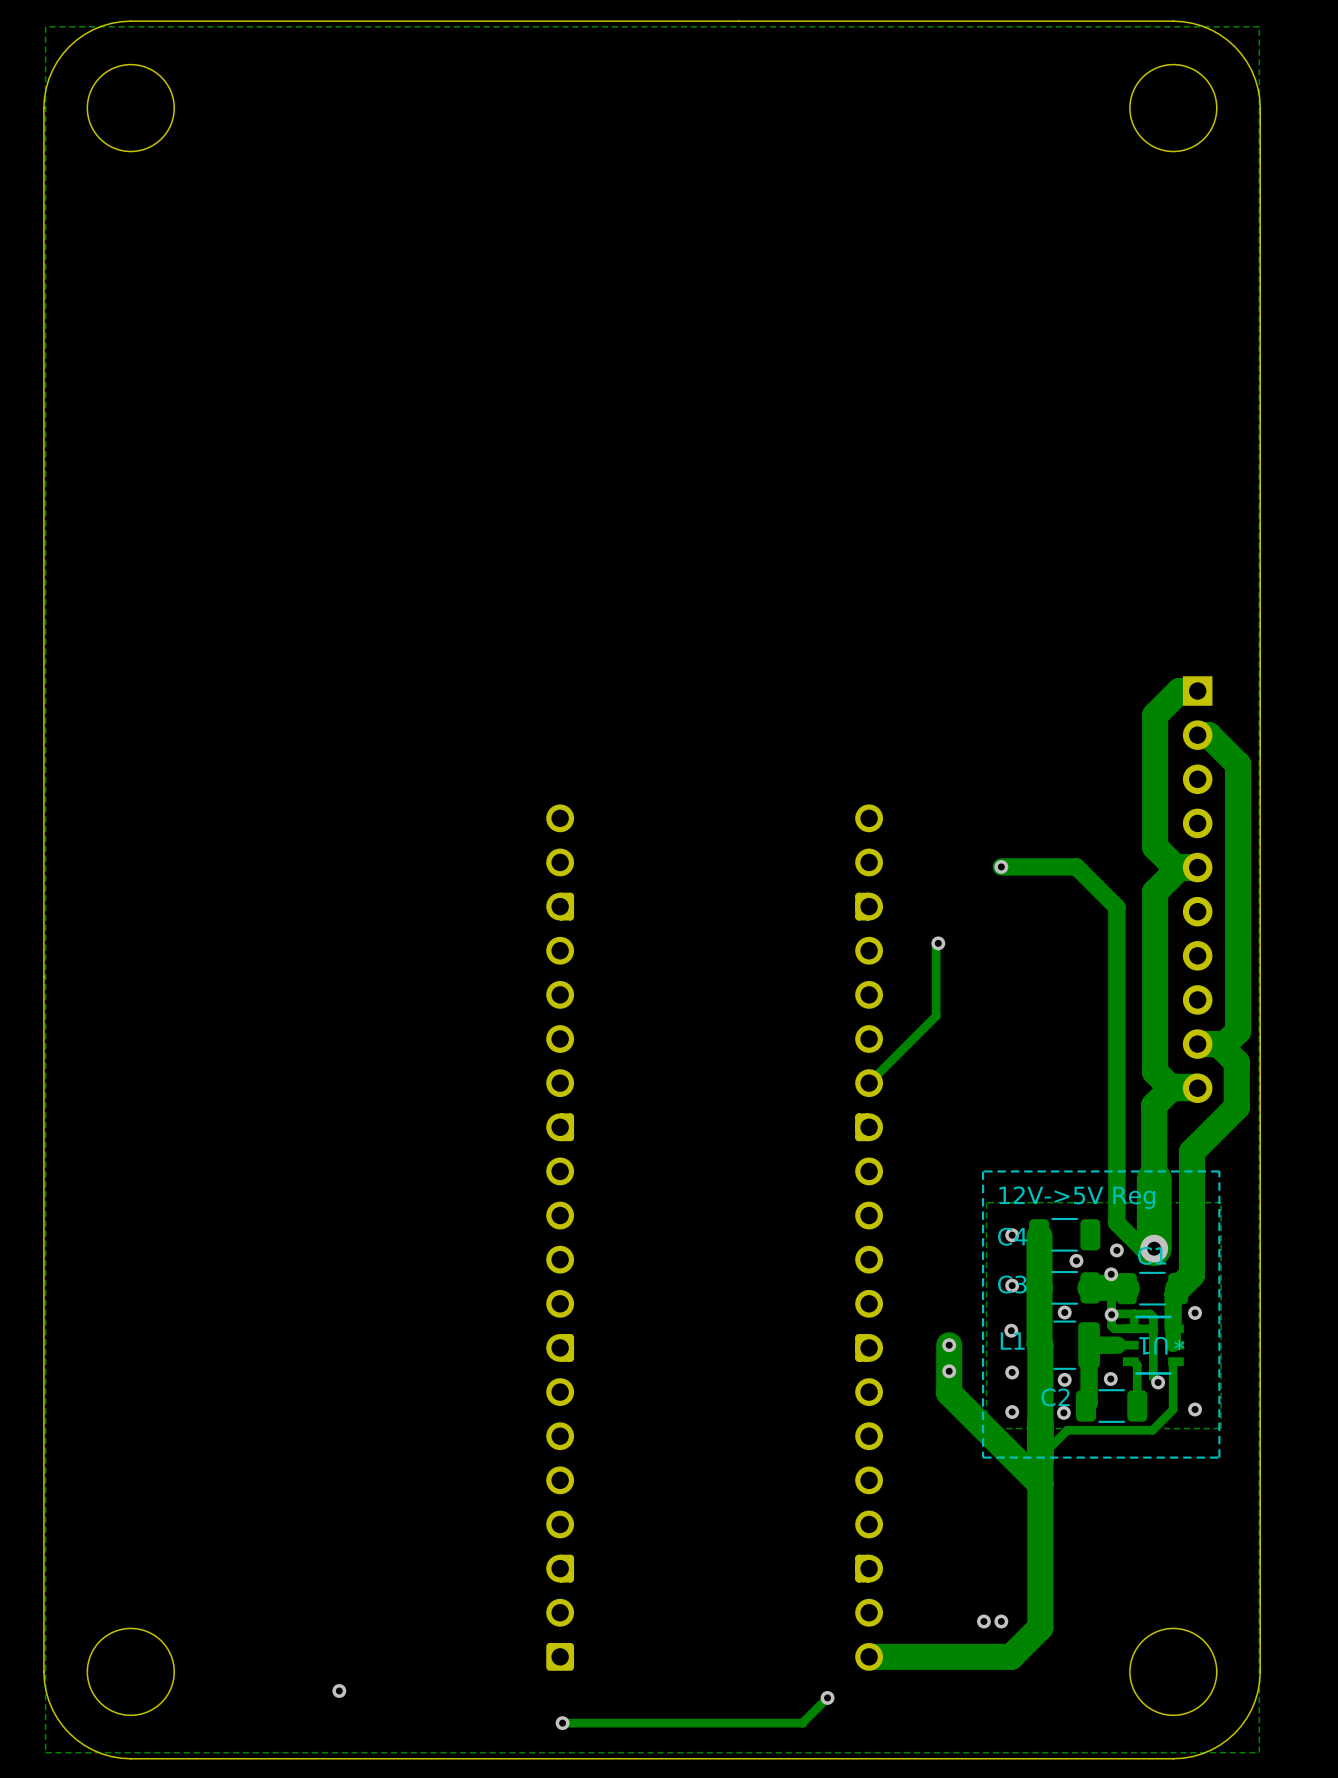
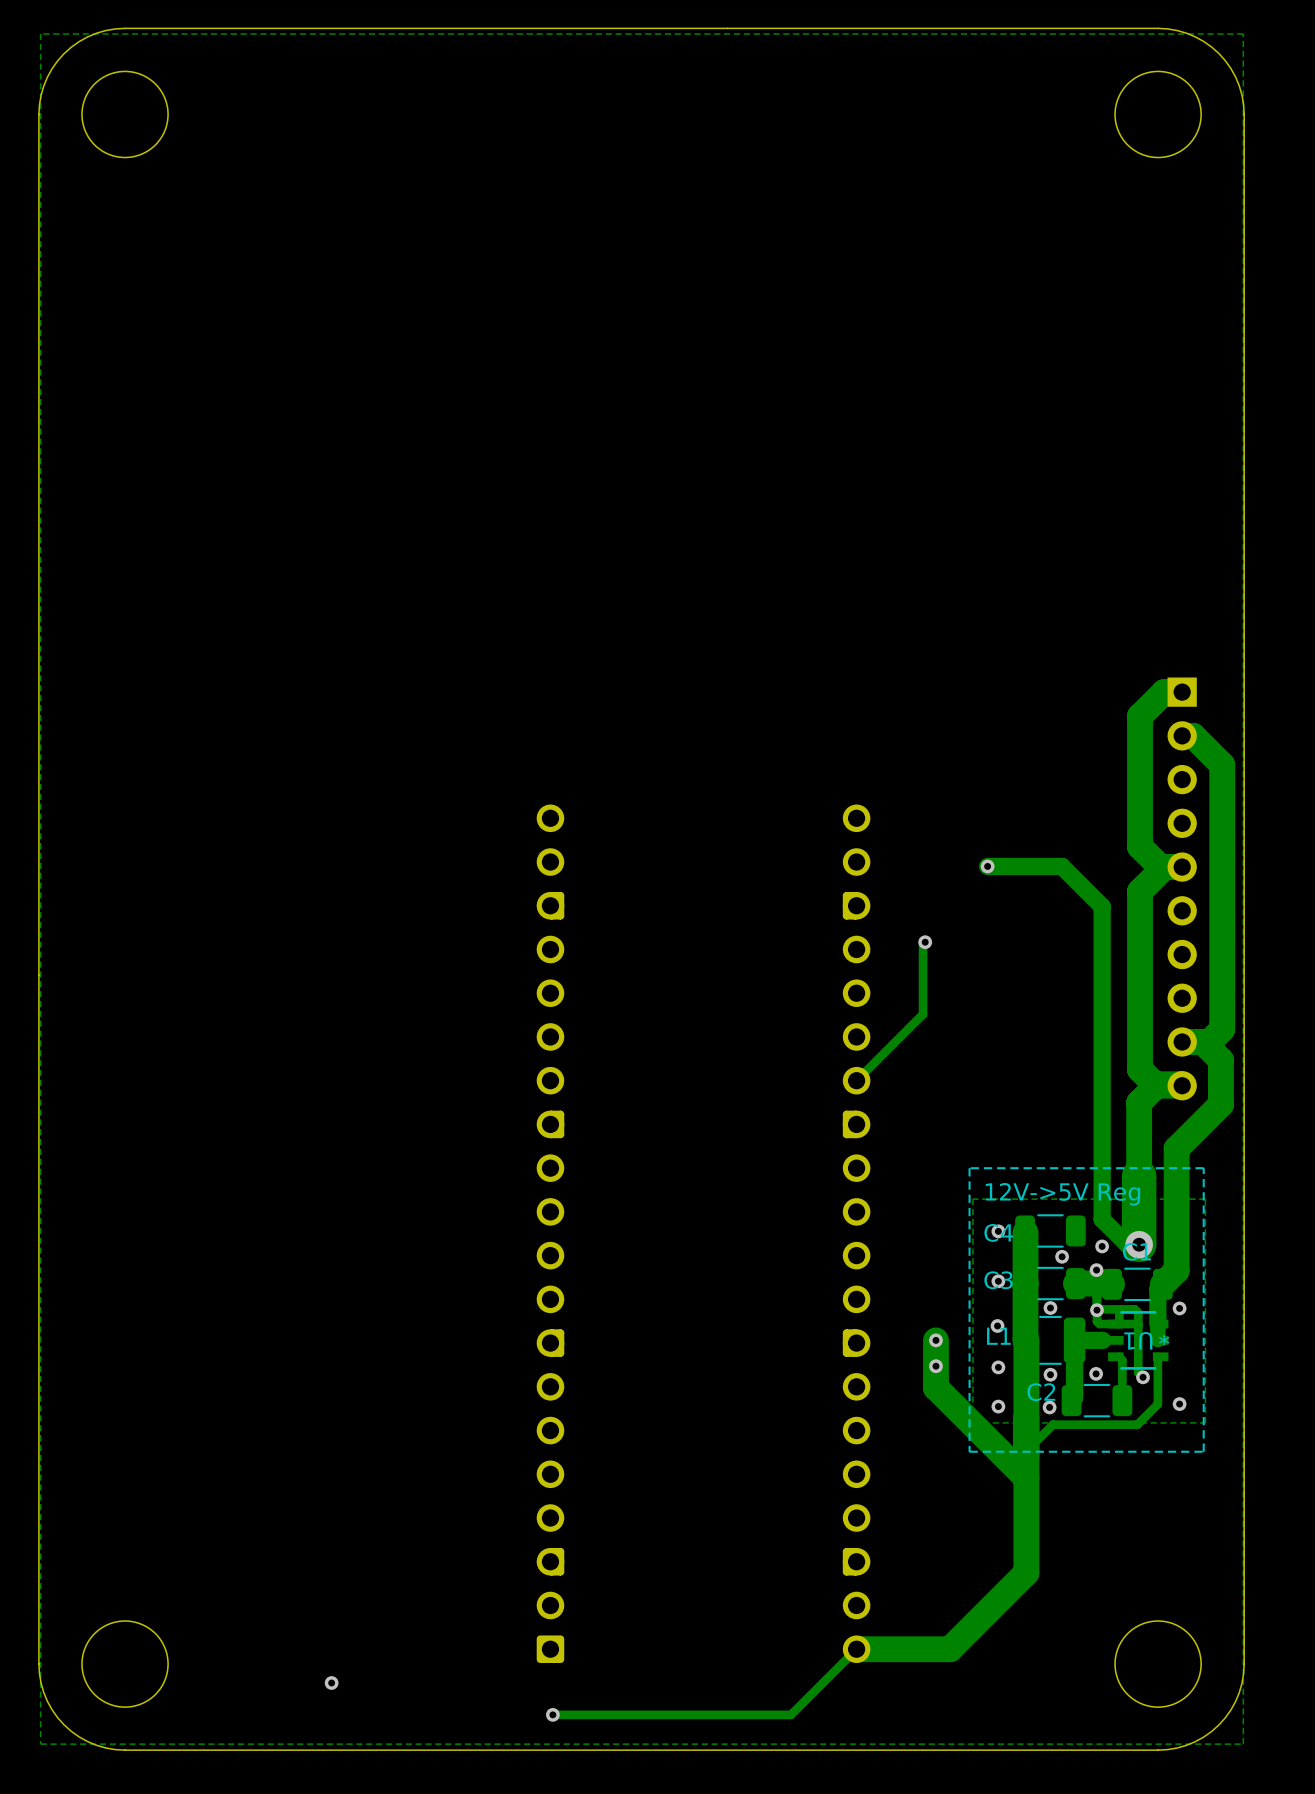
track: (1040, 1579) (1040, 1627) (1011, 1656) (963, 1656) -> (1026, 1572) (949, 1649)
via: (983, 1621) -> none
via: (1001, 1621) -> none
track: (827, 1697) (802, 1723) -> (856, 1649) (790, 1714)
via: (827, 1697) -> none

